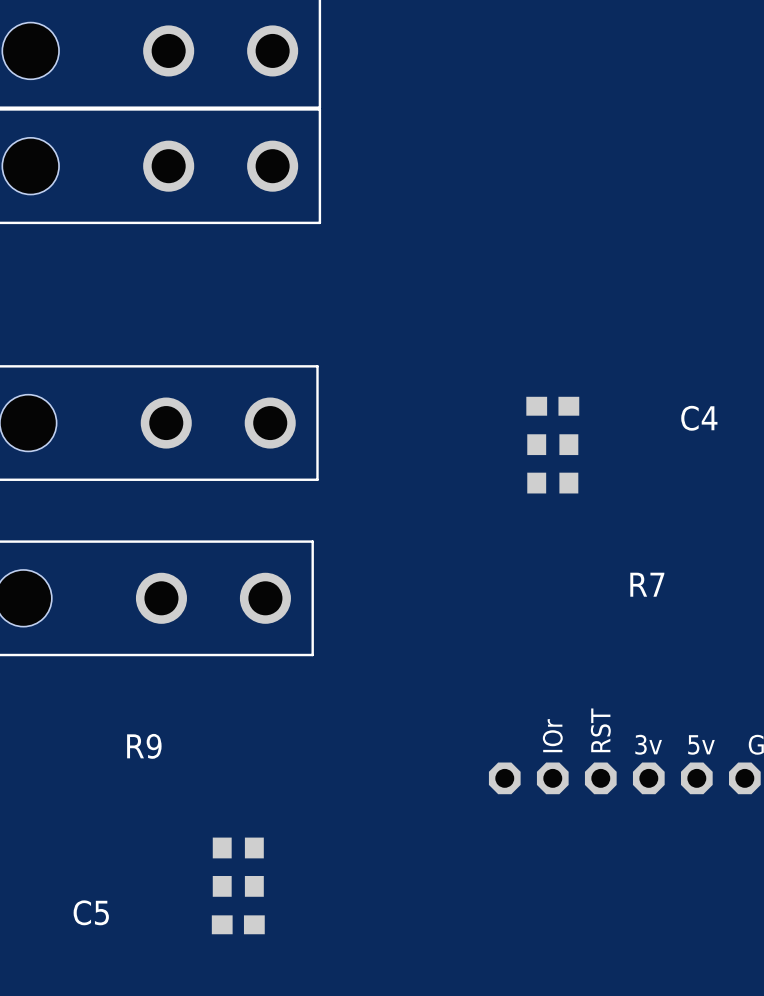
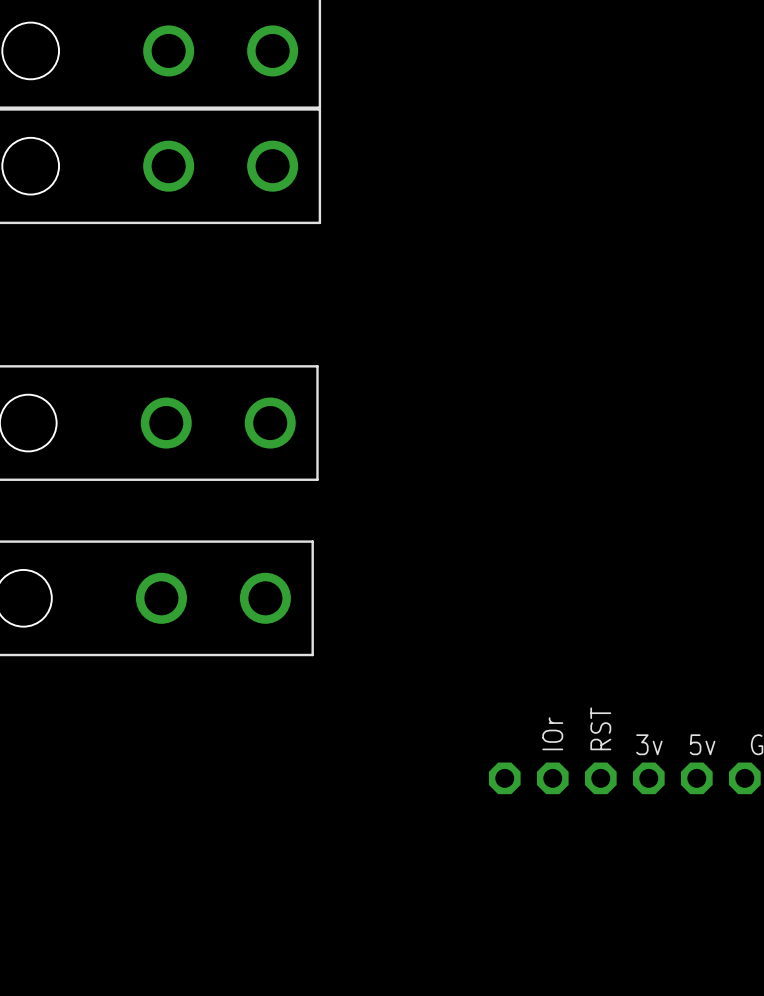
C4: (552, 406) -> none
part: (552, 444) -> none
R7: (552, 483) -> none
R9: (238, 847) -> none
part: (238, 886) -> none
C5: (238, 924) -> none

